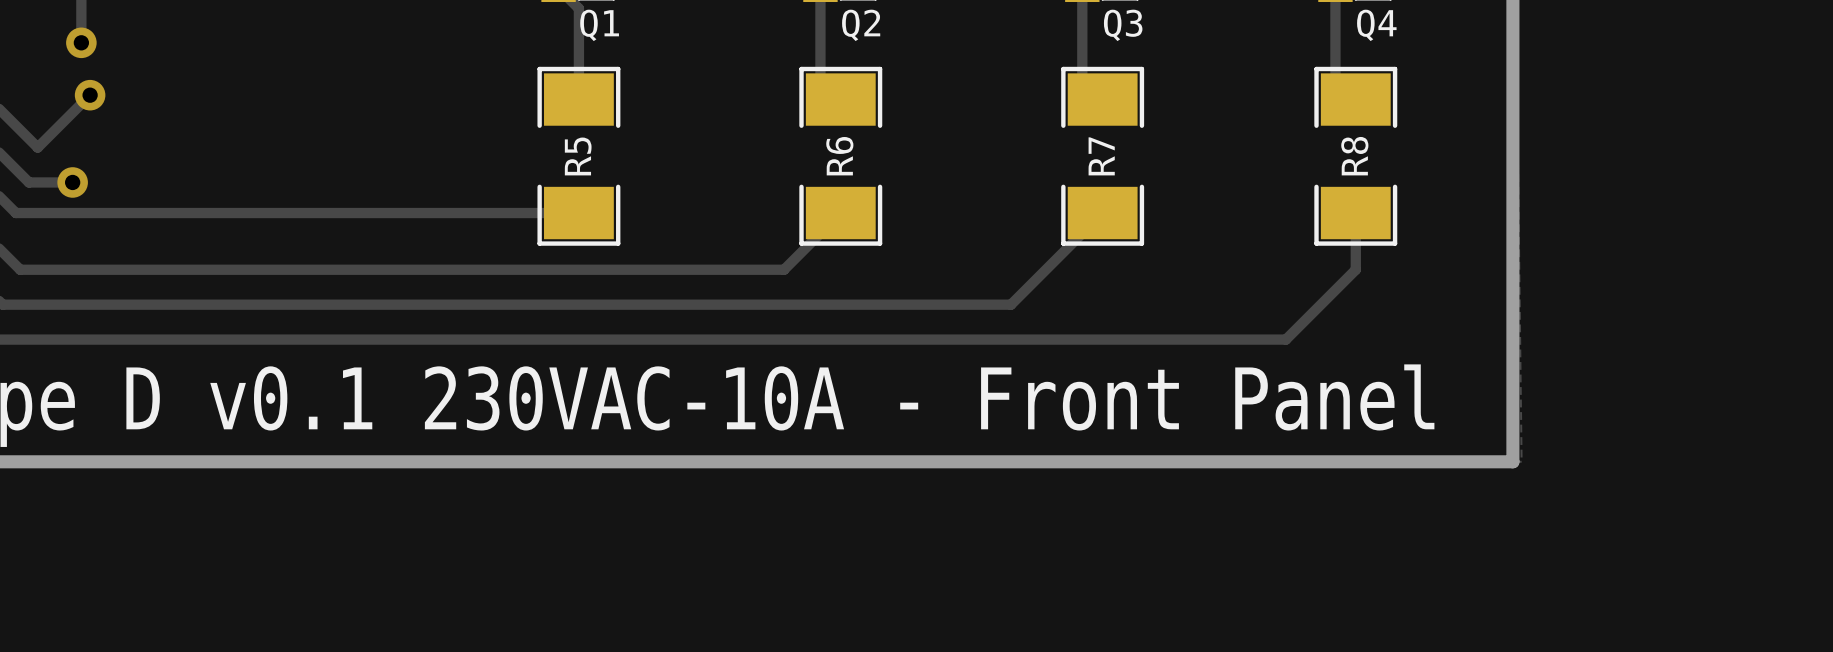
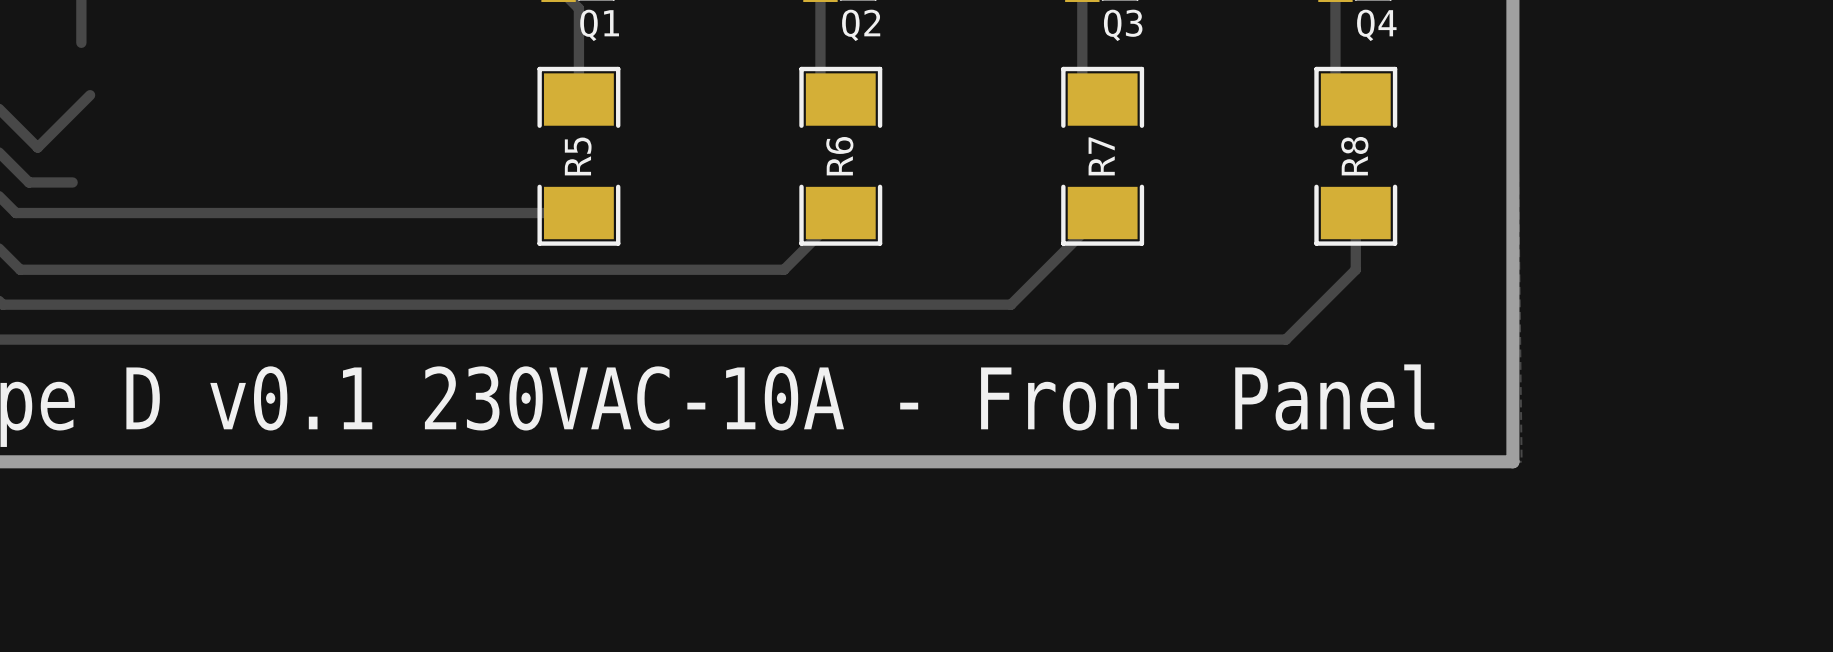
via: (81, 42) -> none
via: (90, 95) -> none
via: (72, 182) -> none

